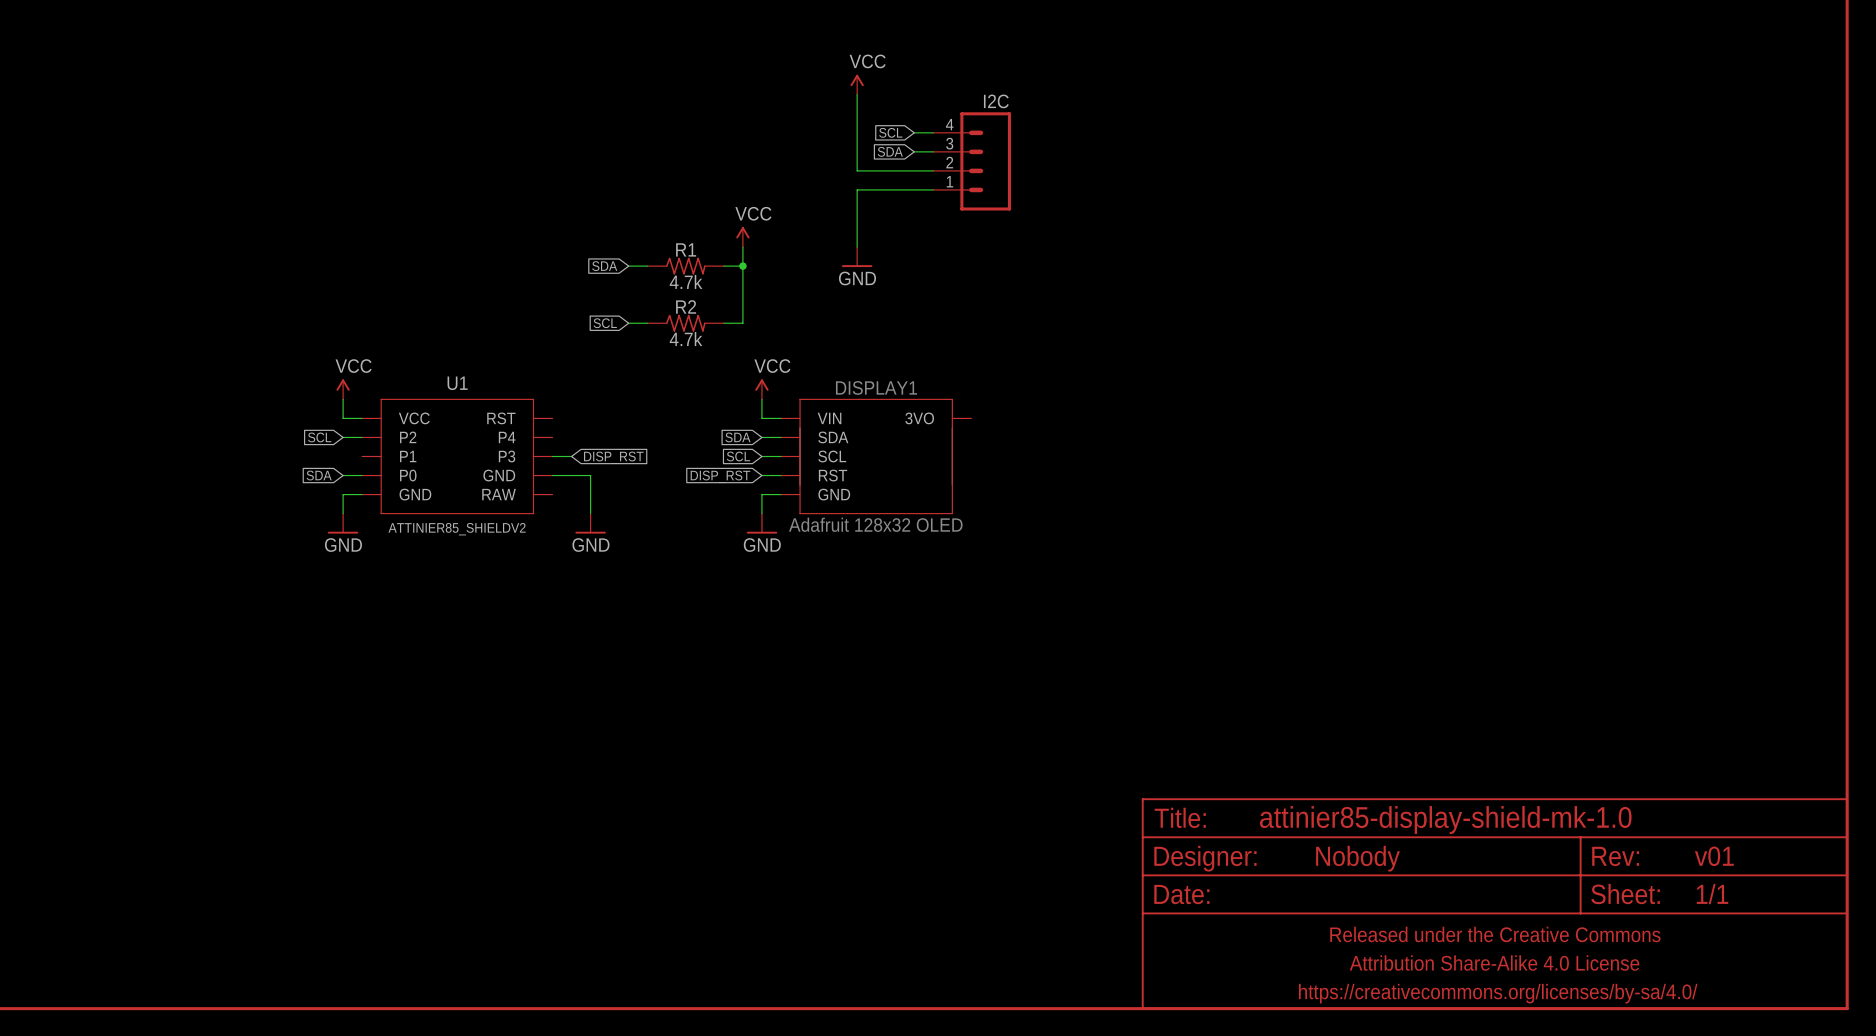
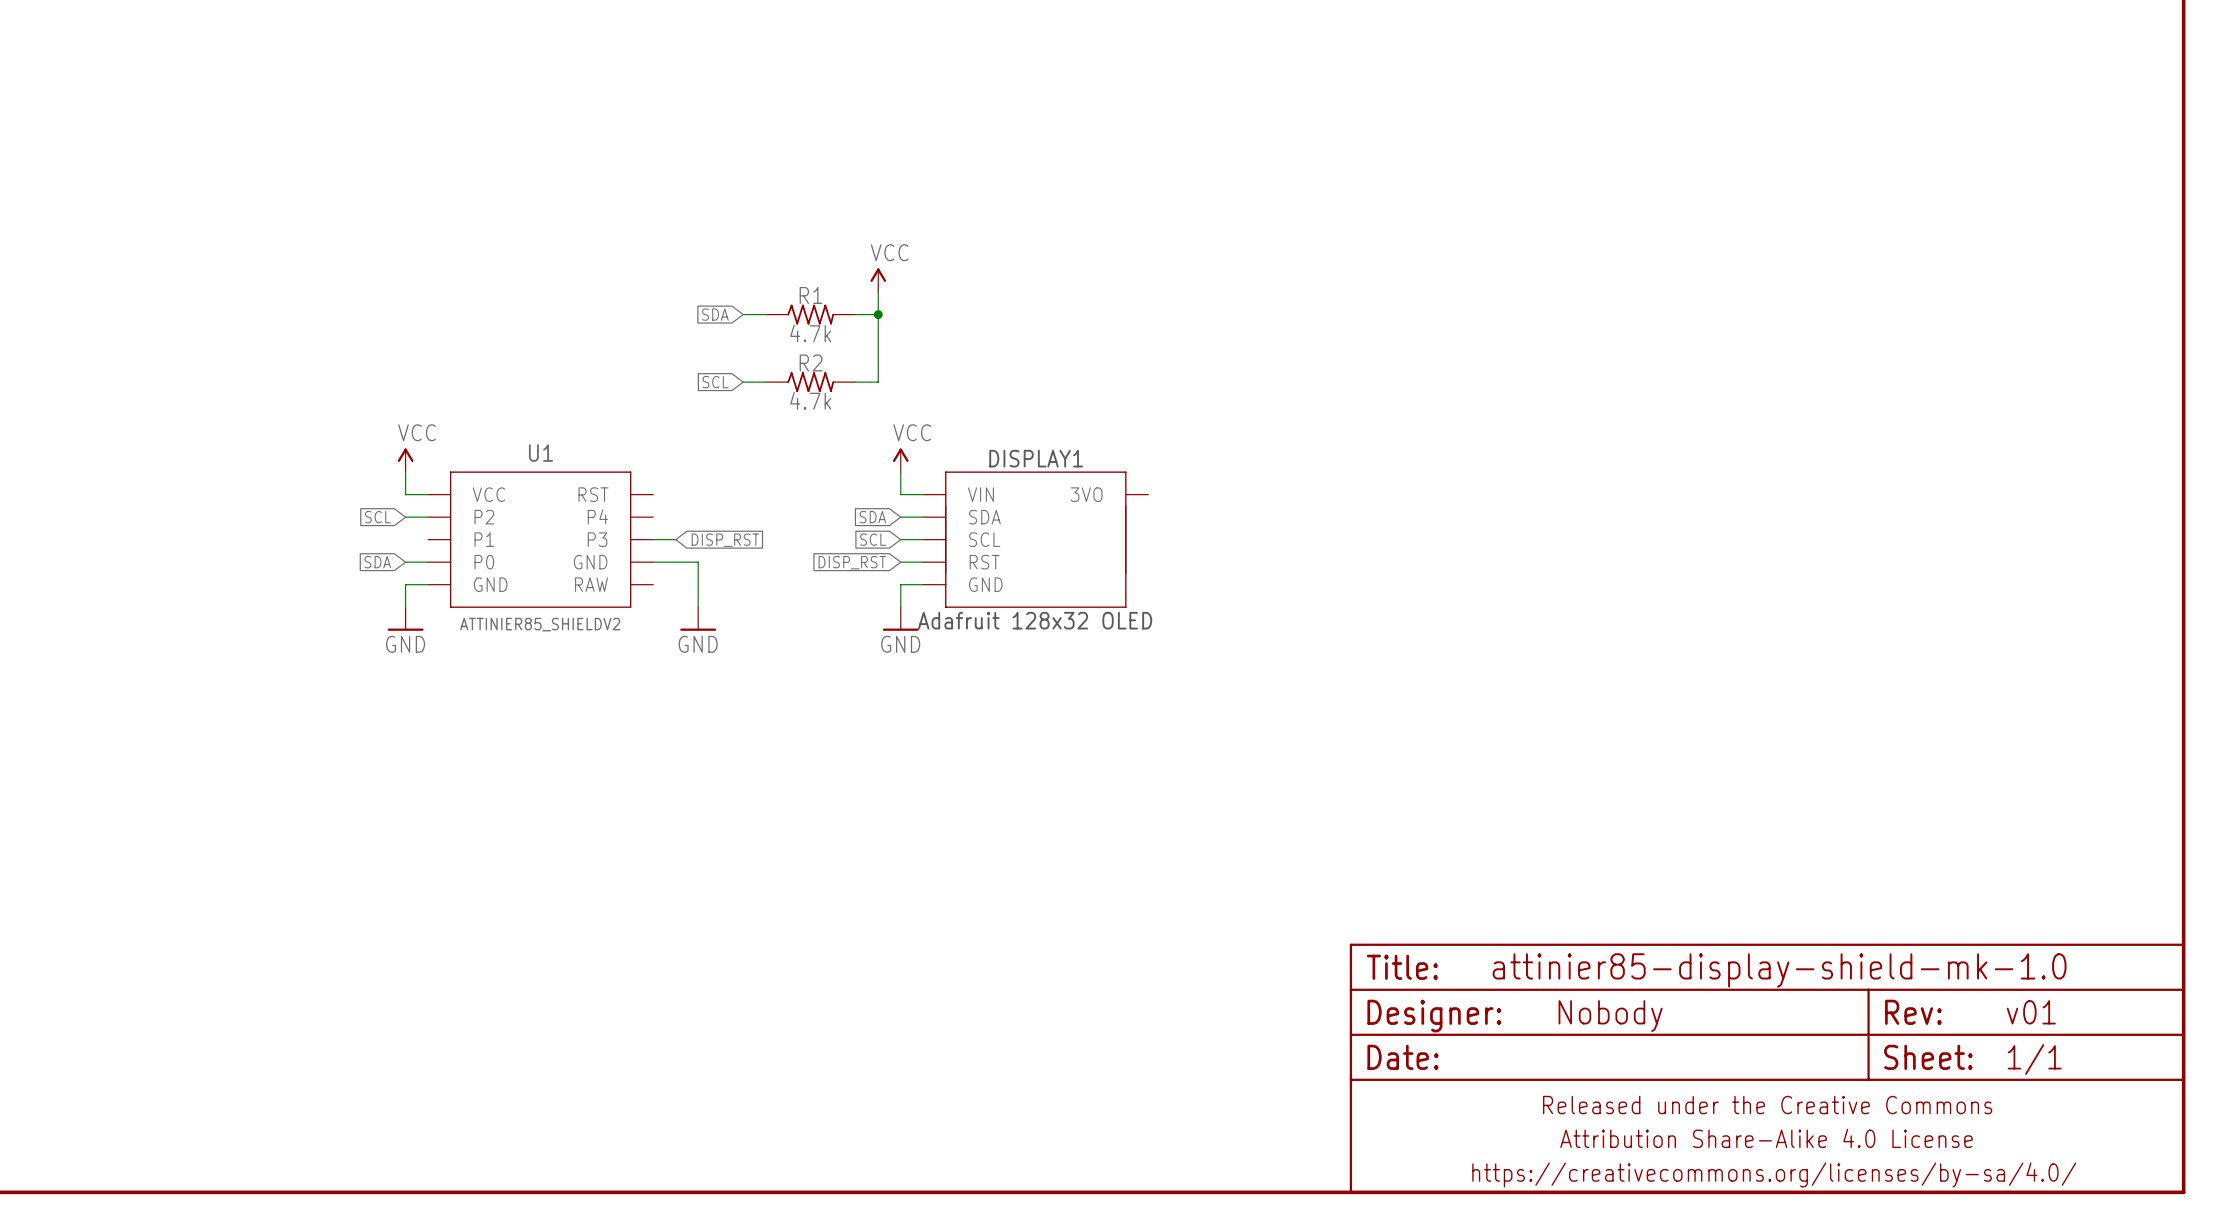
power symbol: VCC (857, 84) -> none
wire: (857, 94) (857, 170) (933, 170) -> none
global label: SCL (890, 132) -> none
wire: (914, 132) (933, 132) -> none
global label: SDA (890, 151) -> none
wire: (914, 151) (933, 151) -> none
I2C: (972, 161) -> none
wire: (933, 189) (857, 189) (857, 247) -> none
power symbol: GND (857, 257) -> none

